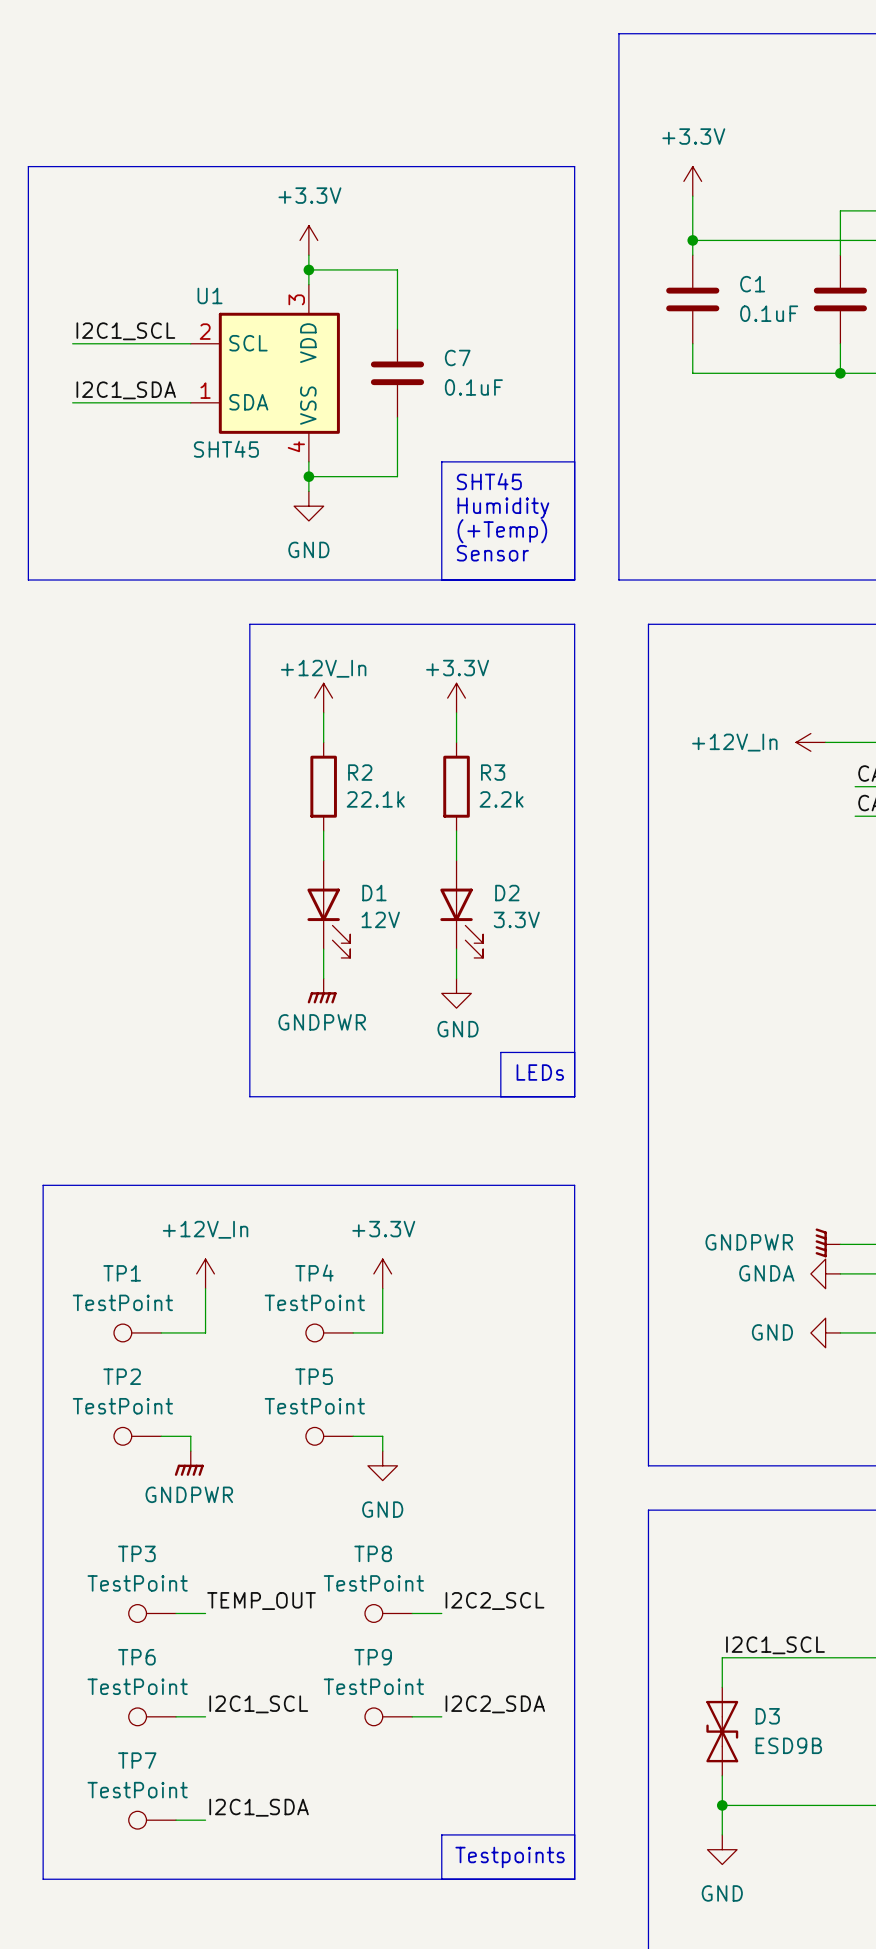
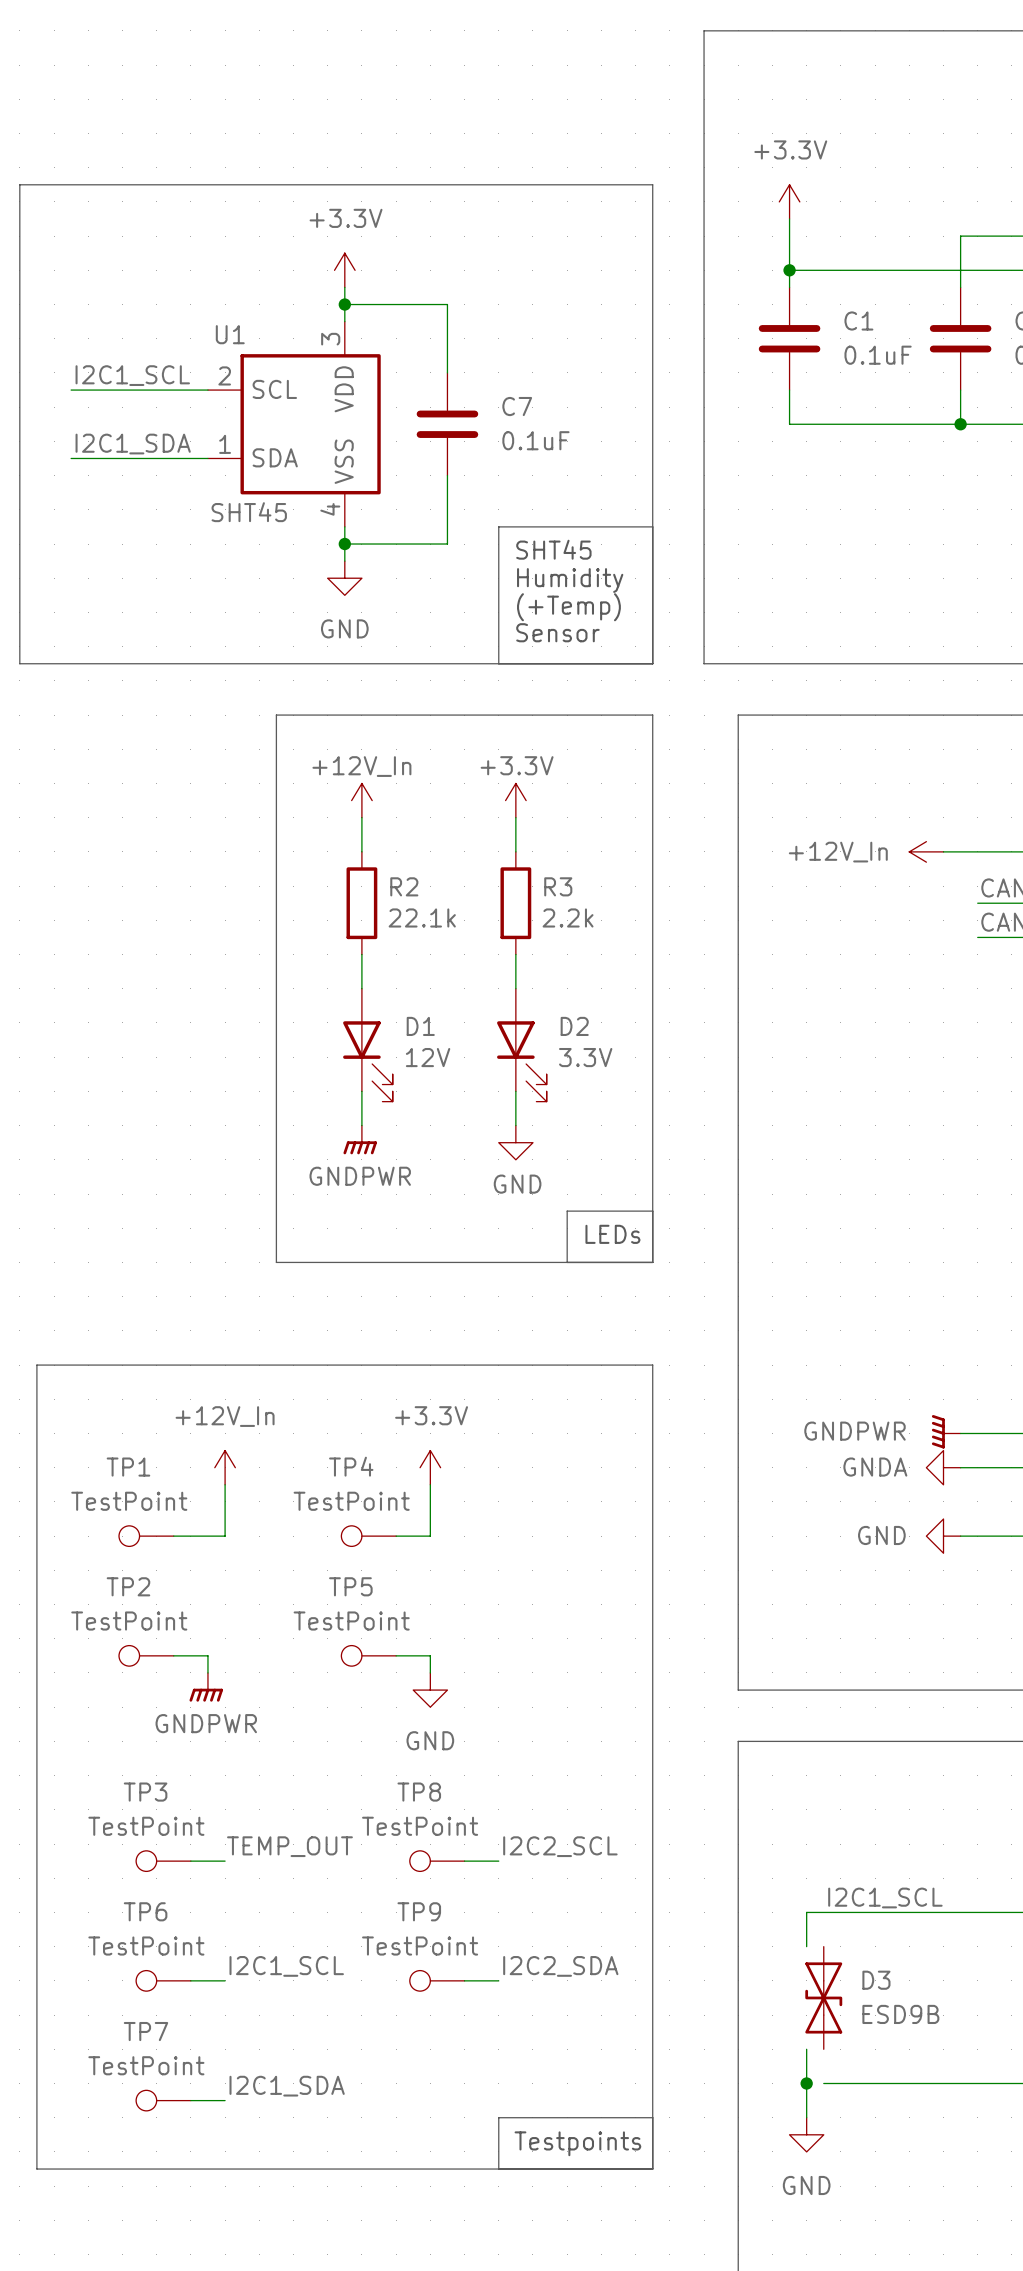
wire: (722, 1657) (722, 1687) -> (823, 1912) (806, 1912) (806, 1946)
wire: (722, 1775) (722, 1834) -> (806, 2049) (806, 2117)
junction position: (722, 1805) -> (806, 2083)
power symbol position: GND (722, 1849) -> GND (806, 2134)

